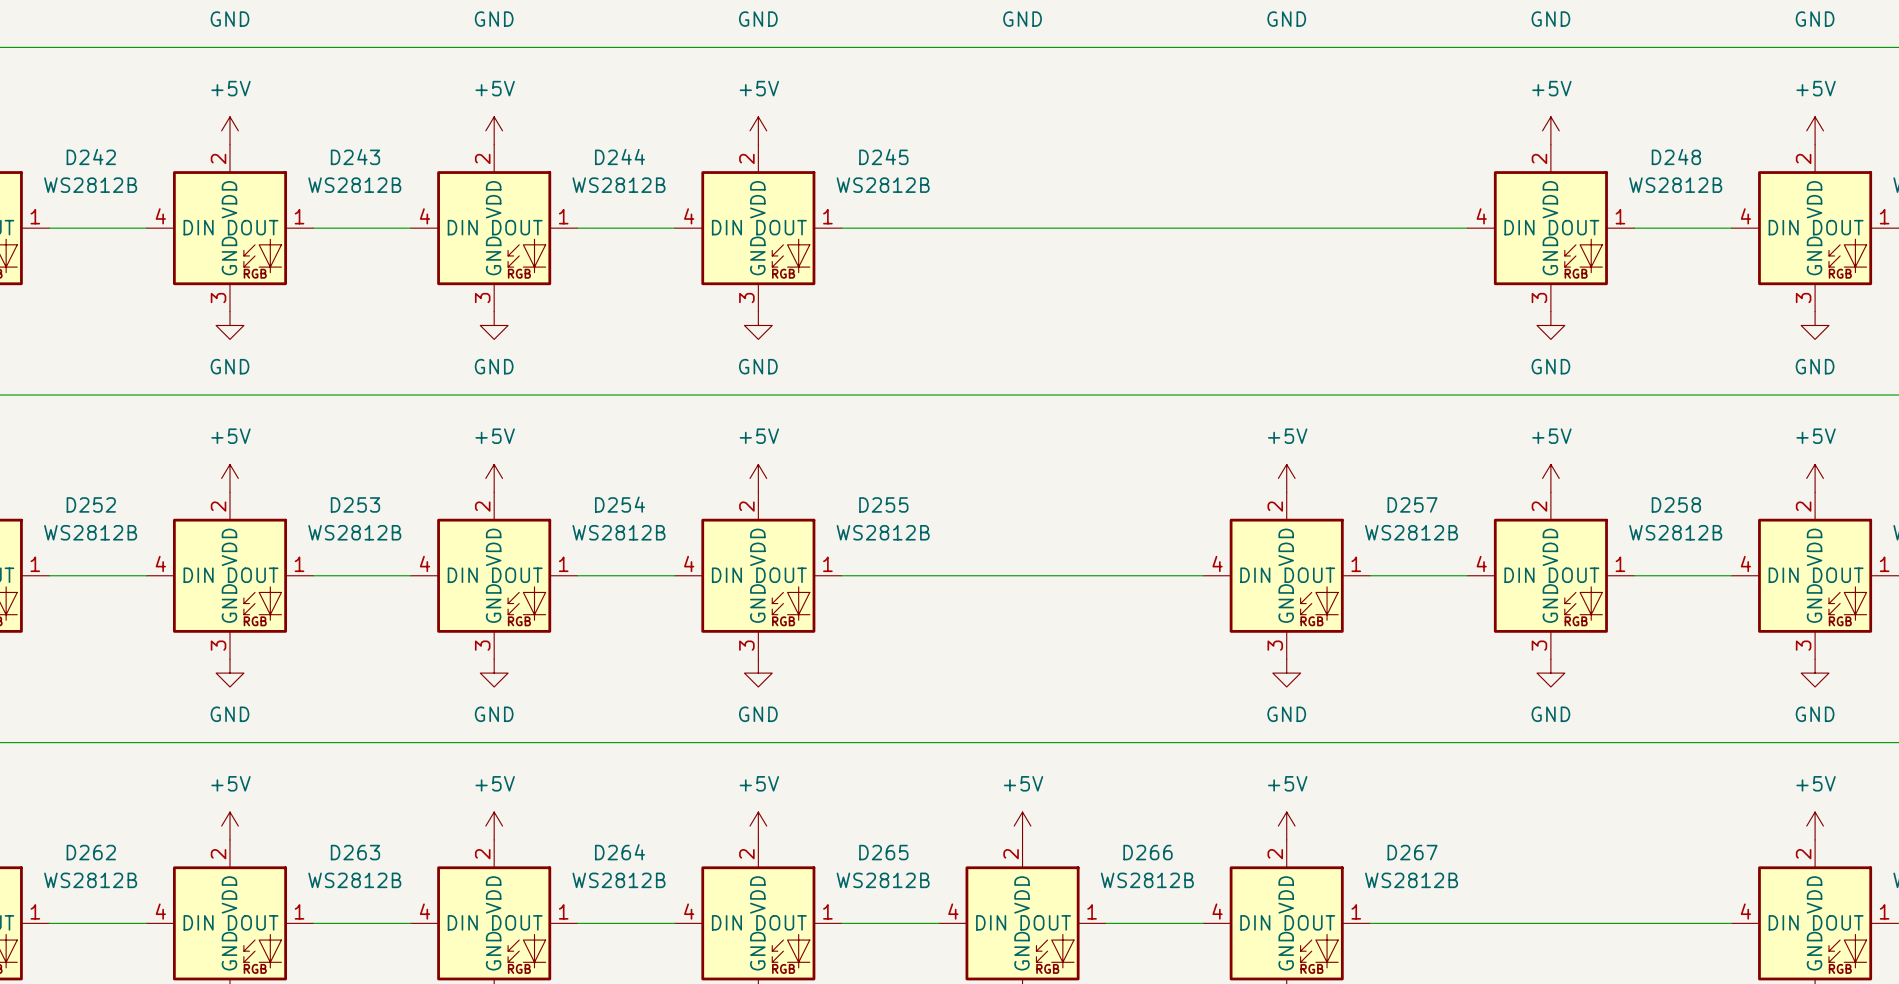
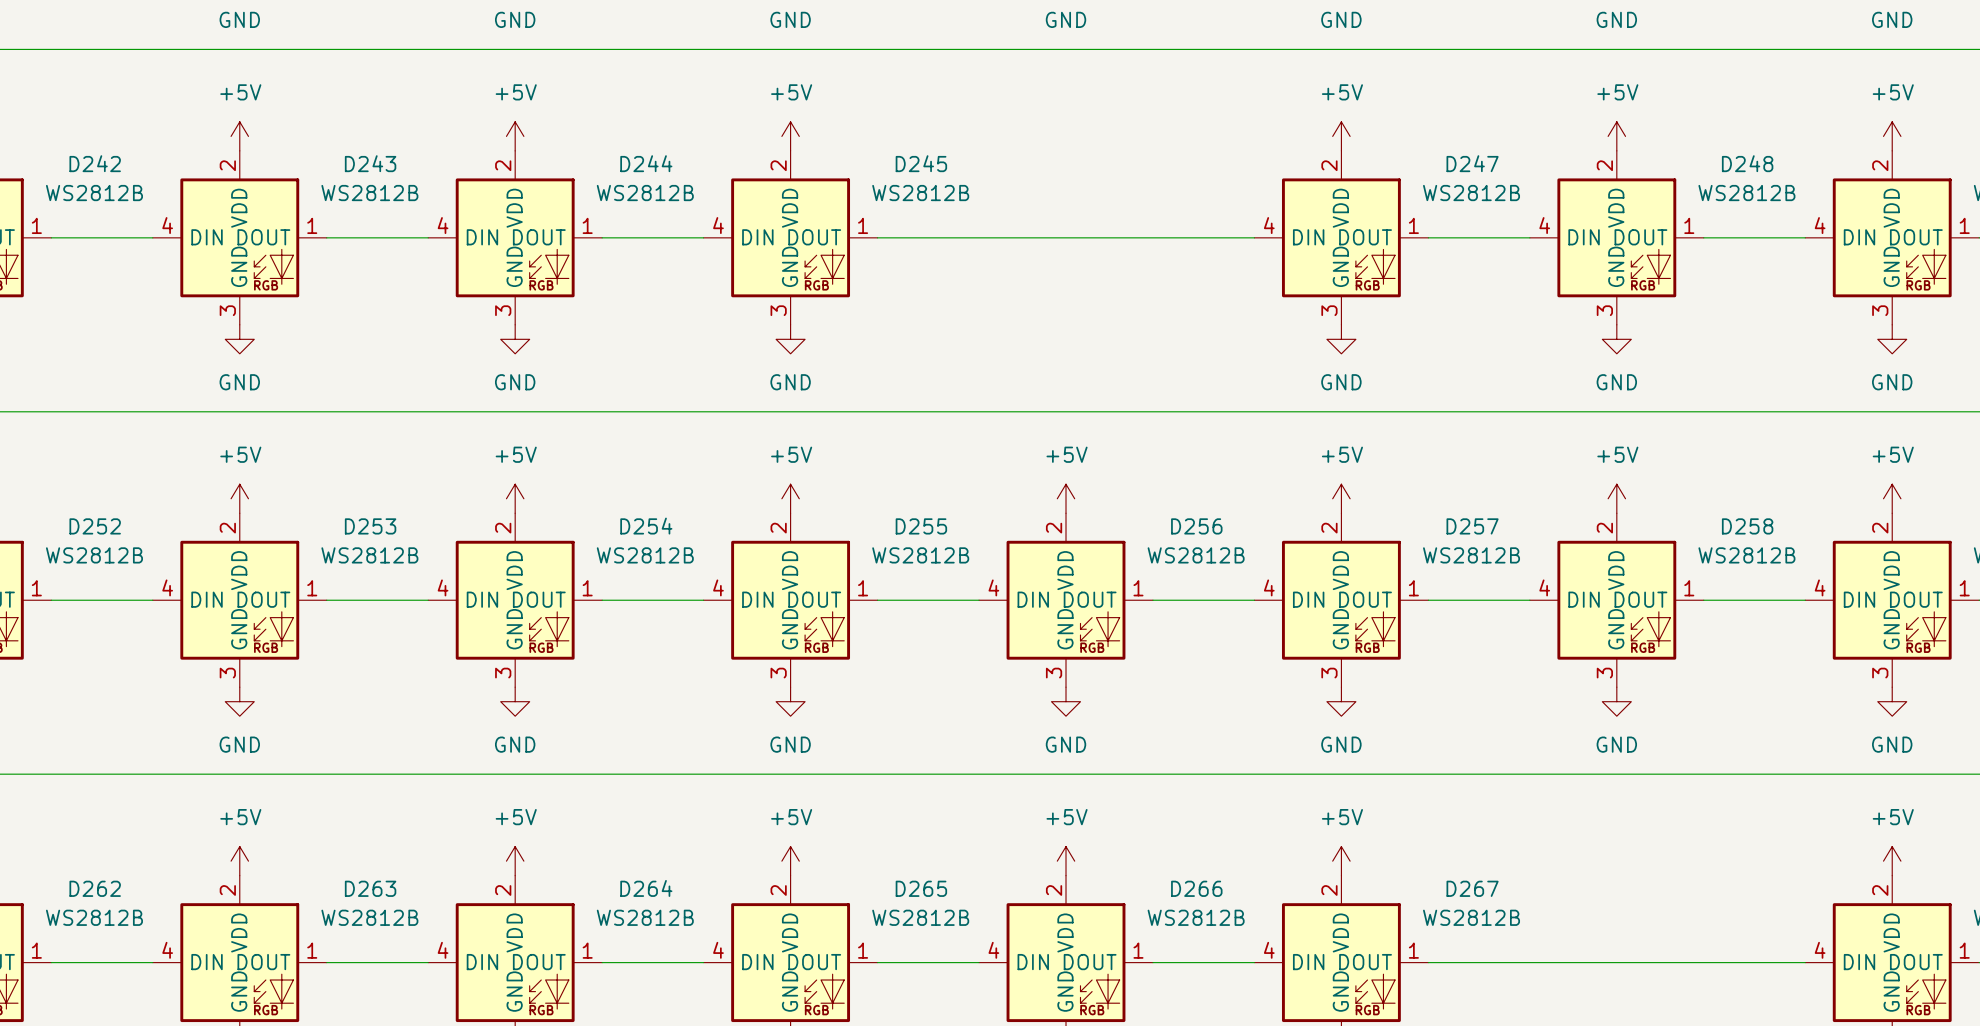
power symbol: none -> +5V (1341, 136)
D247: none -> WS2812B (1341, 237)
power symbol: none -> GND (1341, 339)
power symbol: none -> +5V (1066, 498)
D256: none -> WS2812B (1066, 600)
power symbol: none -> GND (1066, 701)

